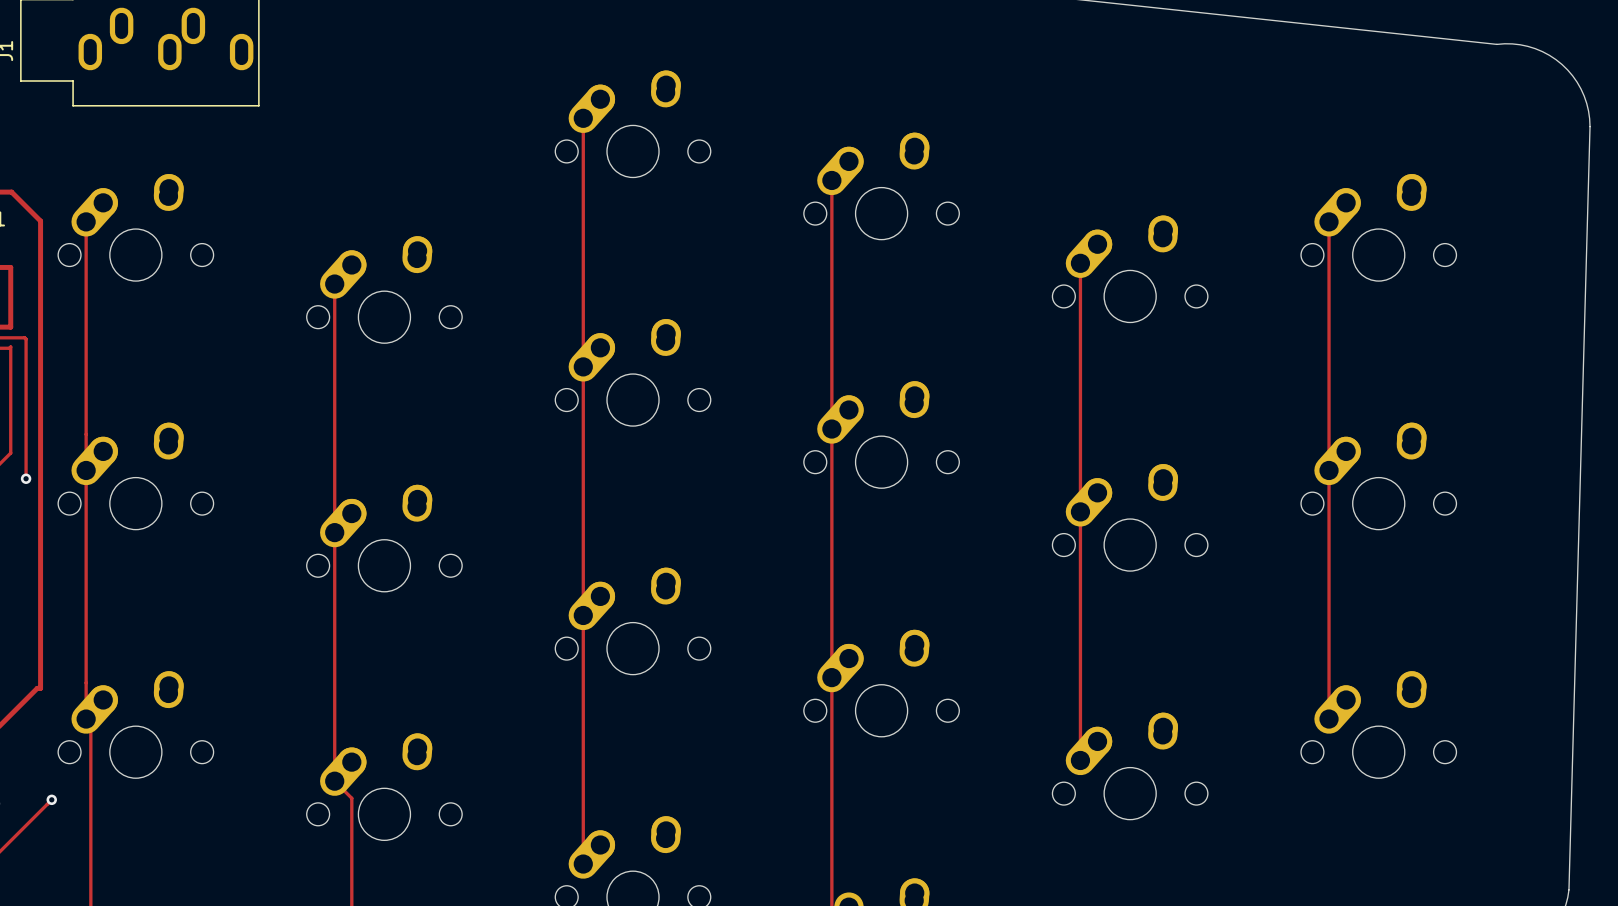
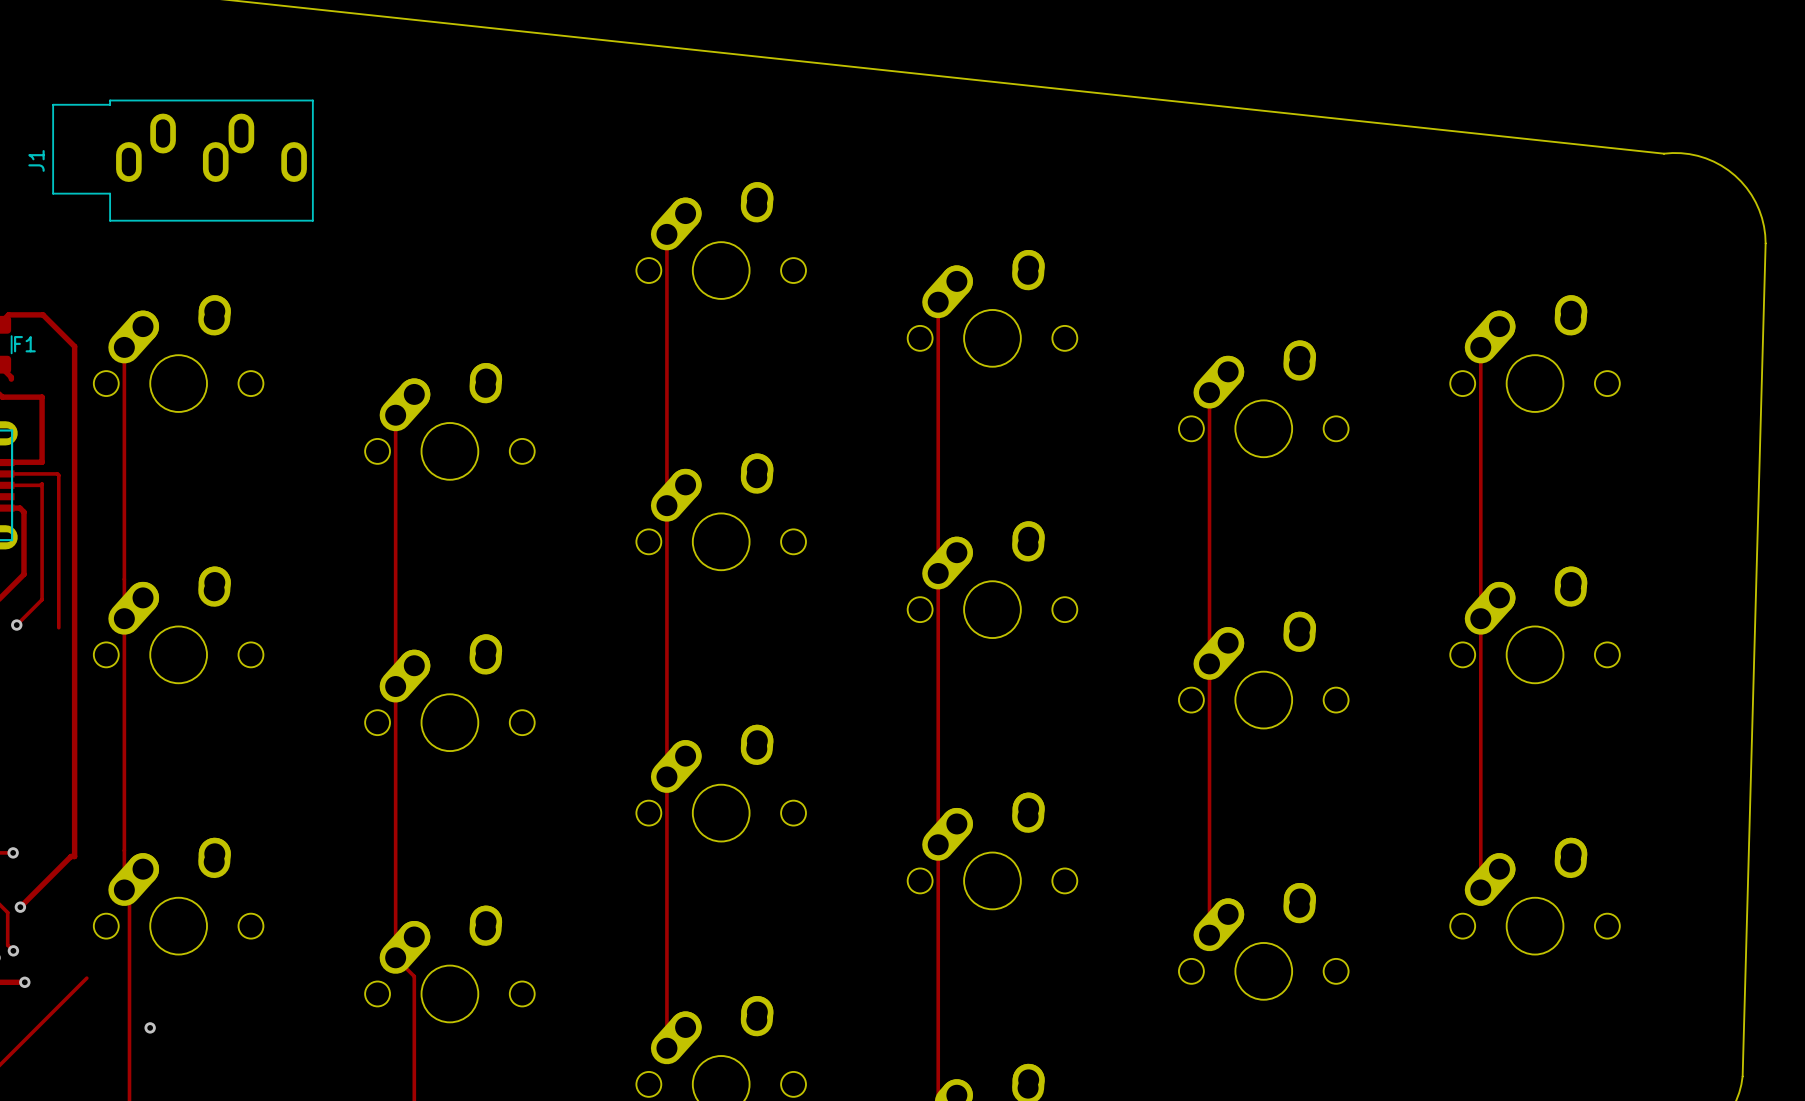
via: (26, 478) -> none
via: (51, 799) -> none
via: none -> (150, 1027)

